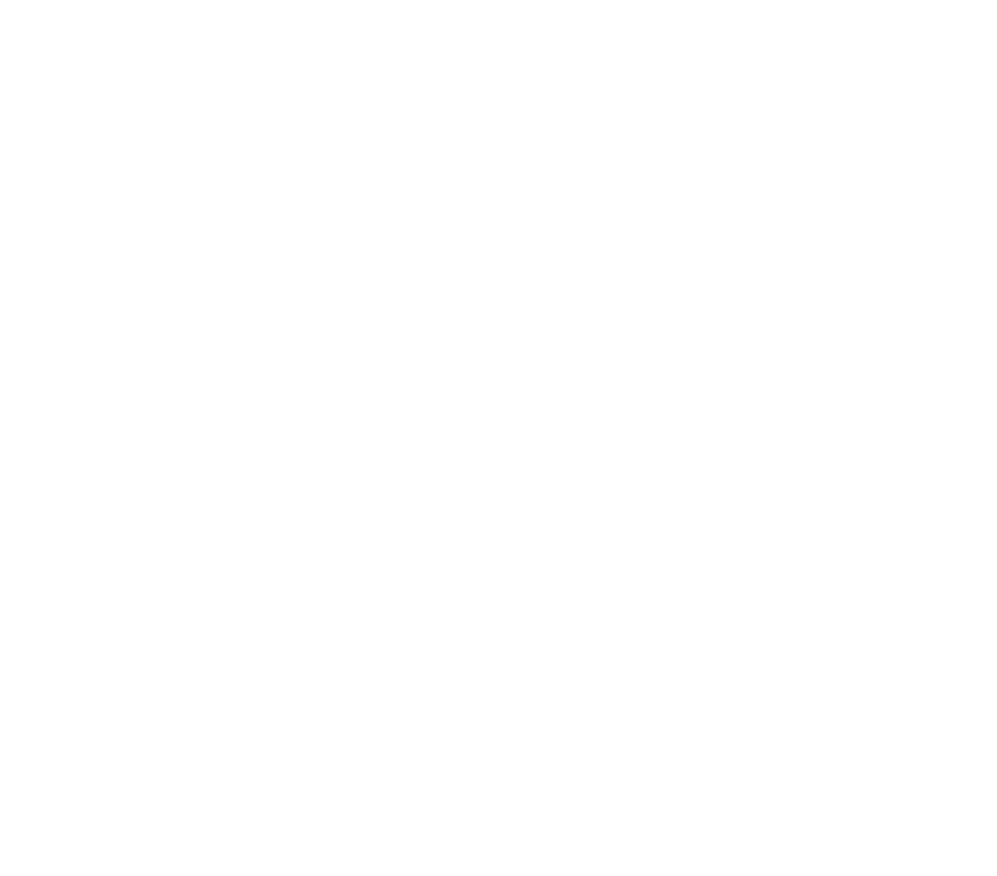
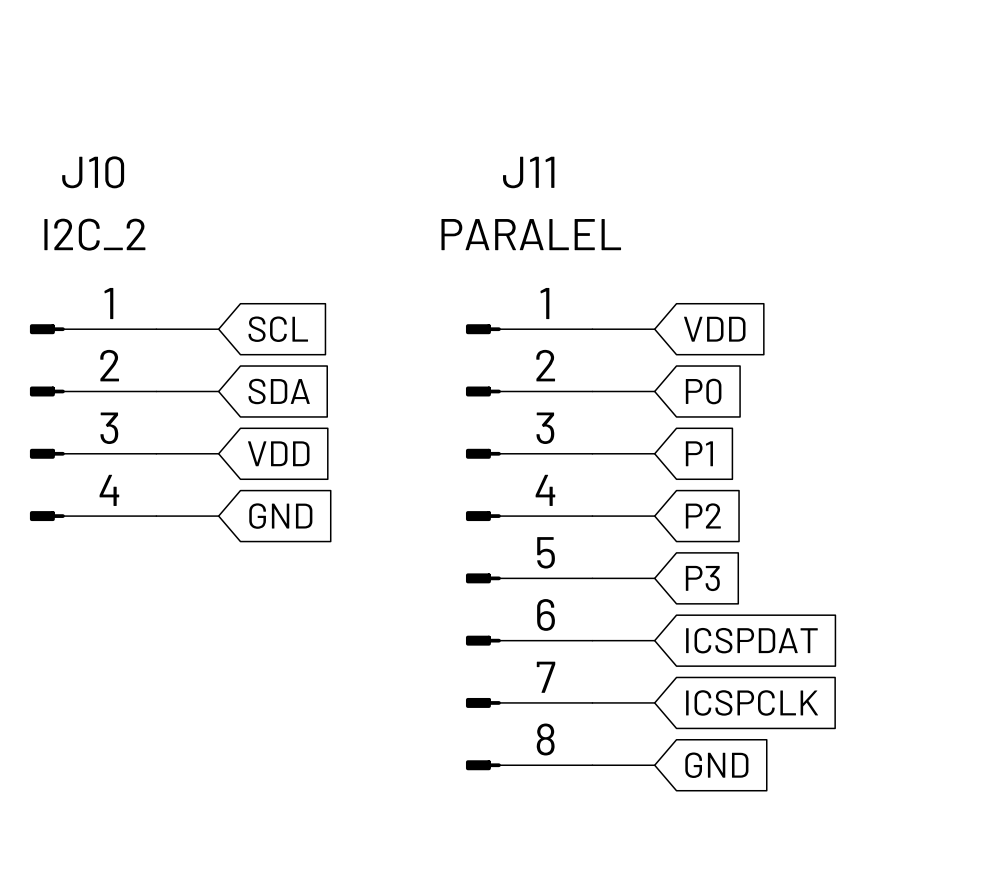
wire: none -> (156, 329) (218, 329)
global label: none -> SCL (278, 329)
wire: none -> (592, 329) (654, 329)
global label: none -> VDD (714, 329)
wire: none -> (156, 391) (218, 391)
global label: none -> SDA (279, 391)
wire: none -> (592, 391) (654, 391)
global label: none -> P0 (703, 391)
J10: none -> I2C_2 (93, 422)
wire: none -> (156, 453) (218, 453)
global label: none -> VDD (278, 453)
wire: none -> (592, 453) (654, 453)
global label: none -> P1 (699, 453)
wire: none -> (156, 516) (218, 516)
global label: none -> GND (280, 516)
wire: none -> (592, 516) (654, 516)
global label: none -> P2 (703, 515)
J11: none -> PARALEL (529, 547)
wire: none -> (592, 578) (654, 578)
global label: none -> P3 (702, 578)
wire: none -> (592, 640) (654, 640)
global label: none -> ICSPDAT (751, 640)
wire: none -> (592, 702) (654, 702)
global label: none -> ICSPCLK (752, 702)
wire: none -> (592, 765) (654, 765)
global label: none -> GND (716, 765)

